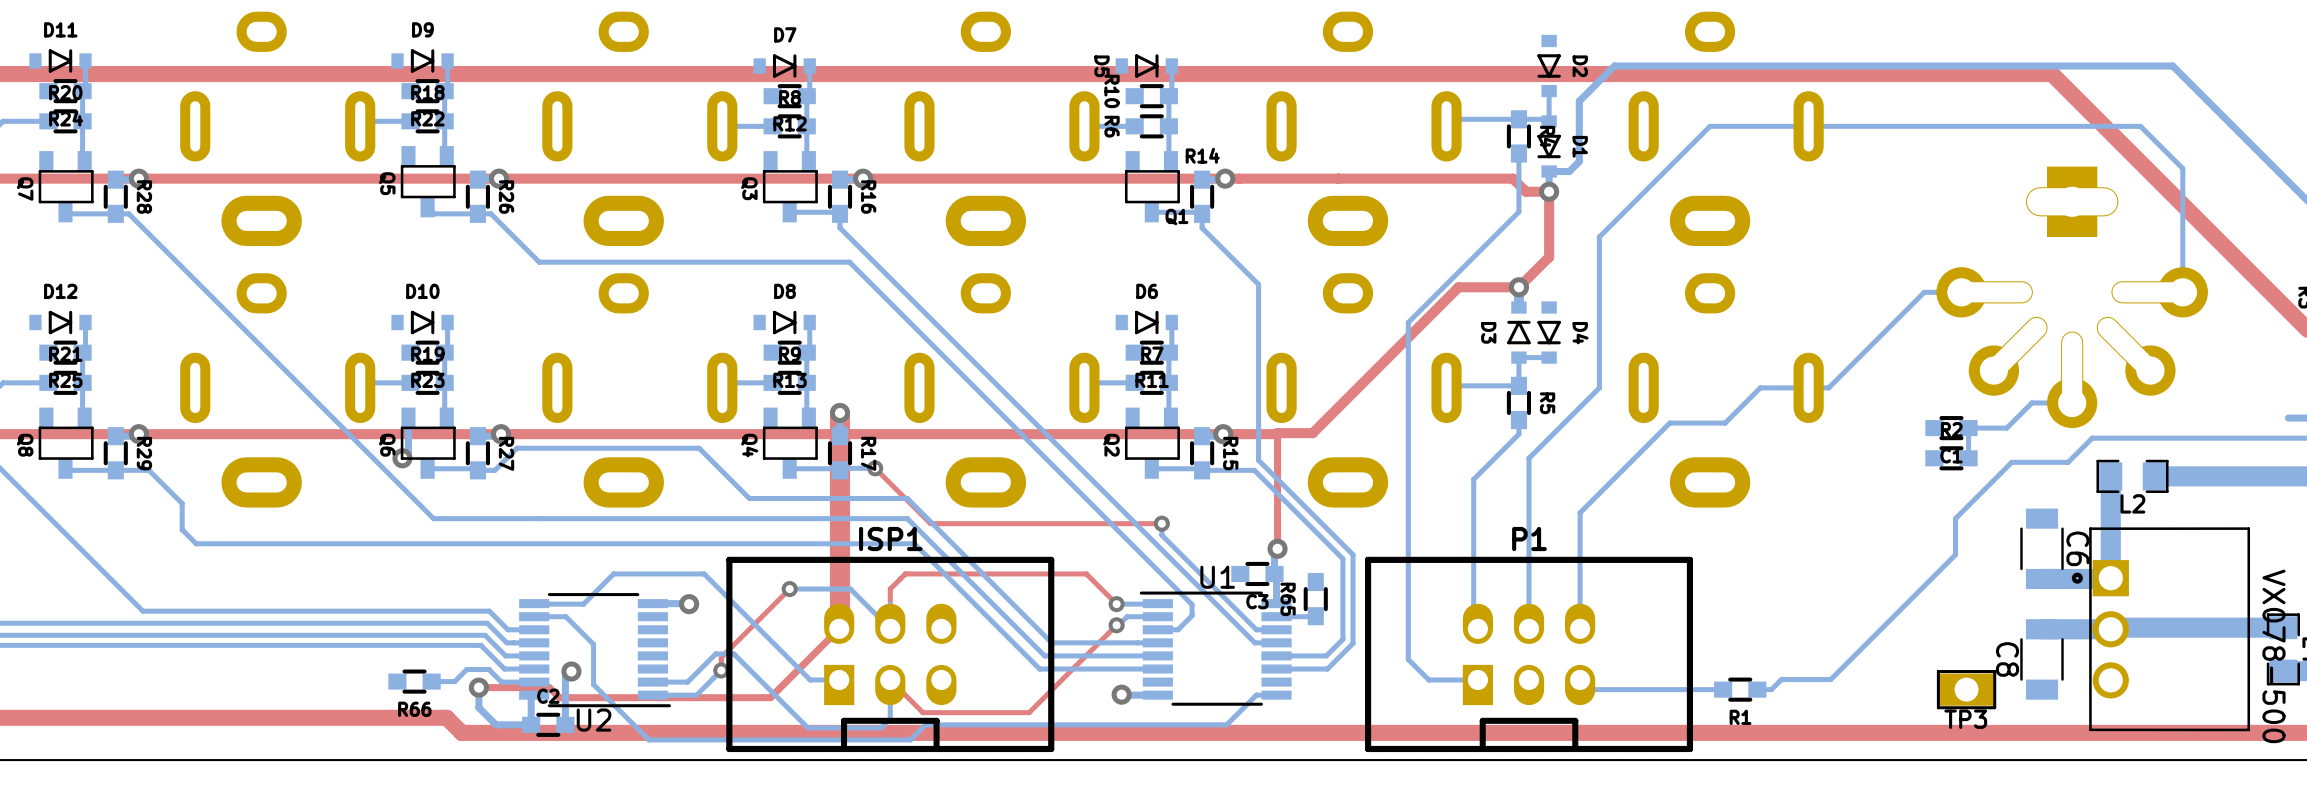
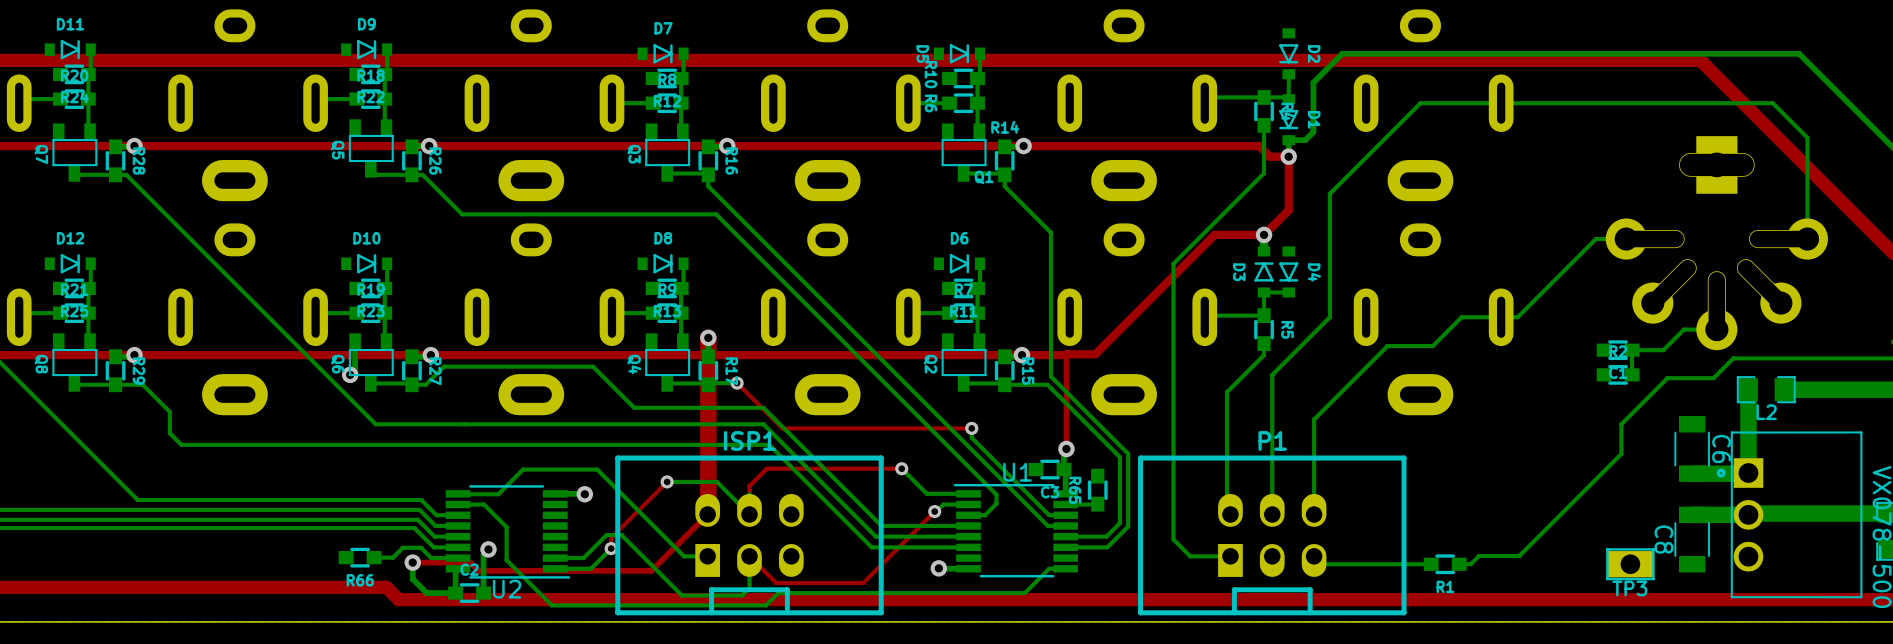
top track: (890, 594) (890, 589) (905, 573) (1086, 573) (1116, 604) -> (749, 486) (766, 468) (901, 468)
bottom track: (1157, 603) (1116, 604) -> (968, 493) (926, 493) (901, 468)
via position: (1116, 604) -> (901, 468)

